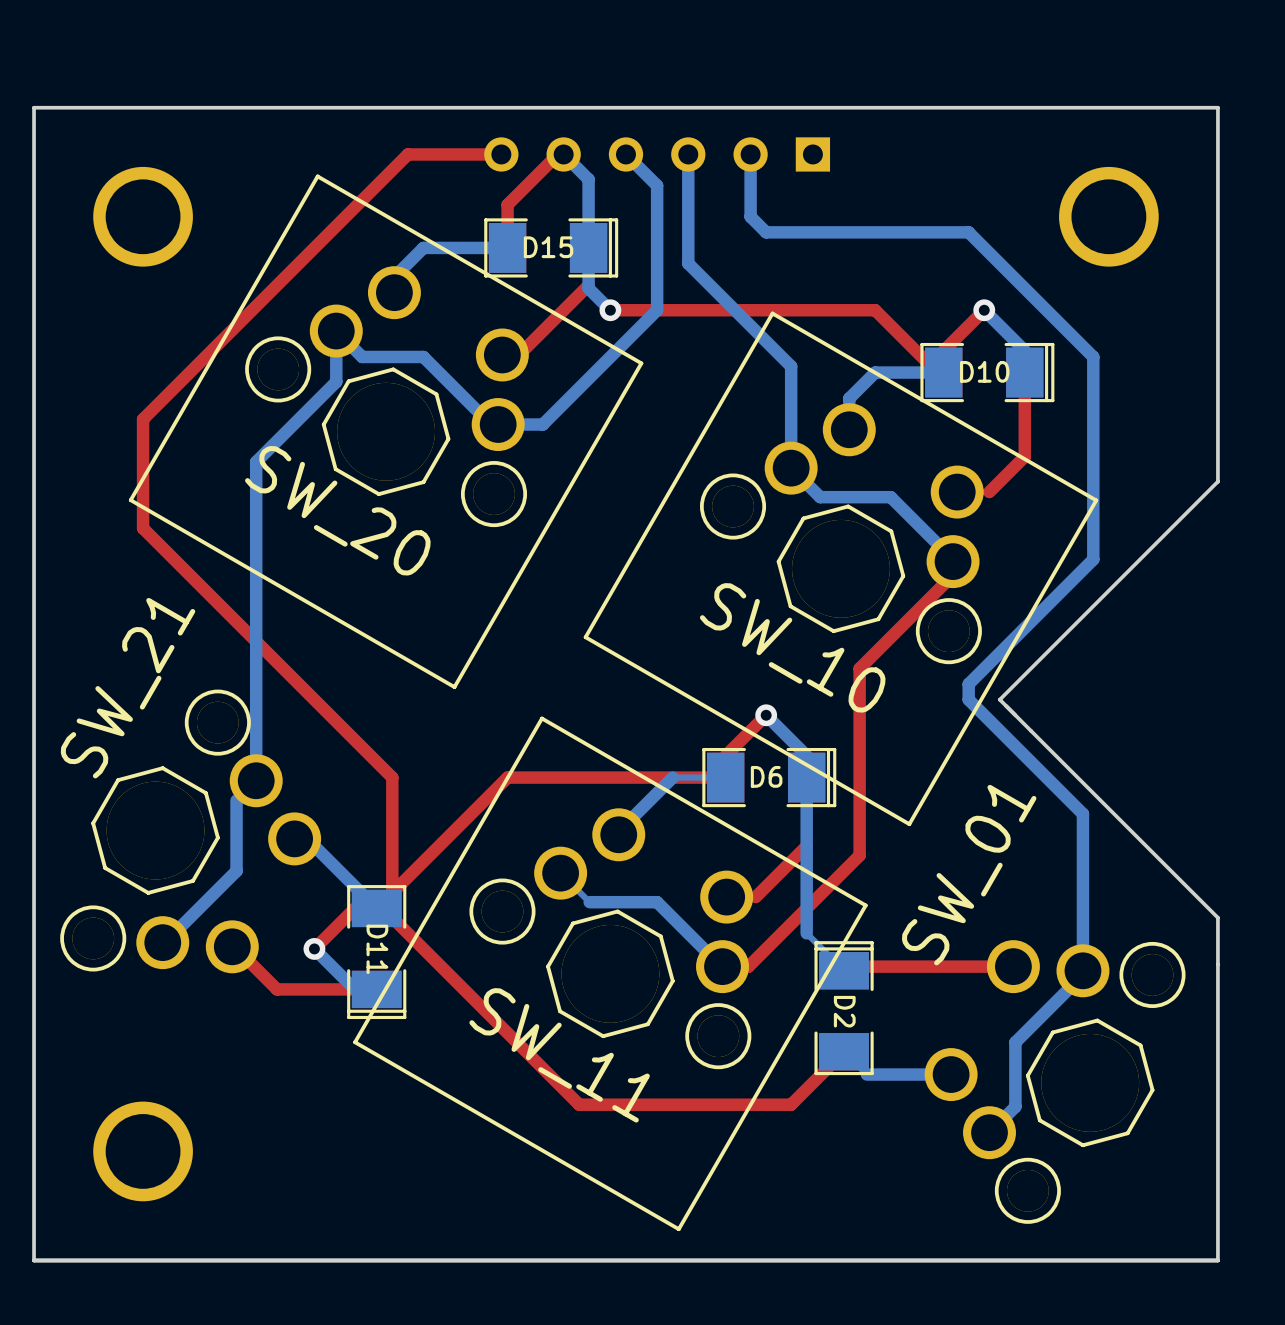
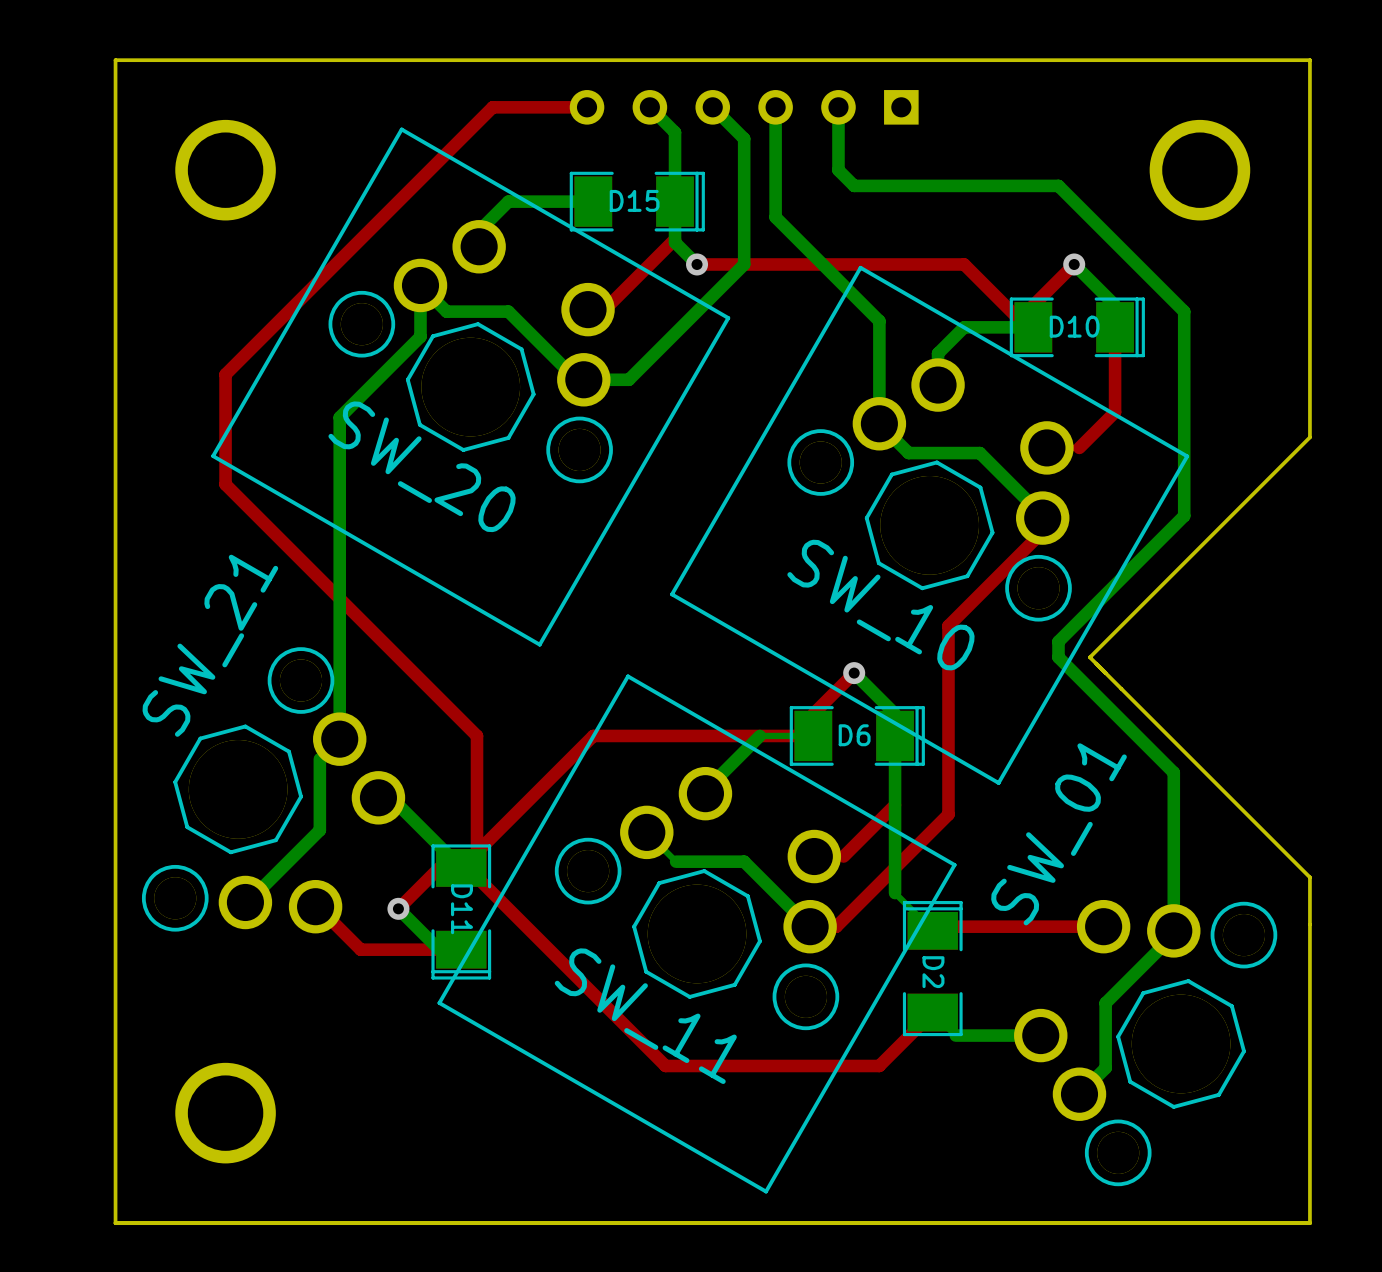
top track: (563, 154) (557, 154) (507, 204) (507, 247) -> none

